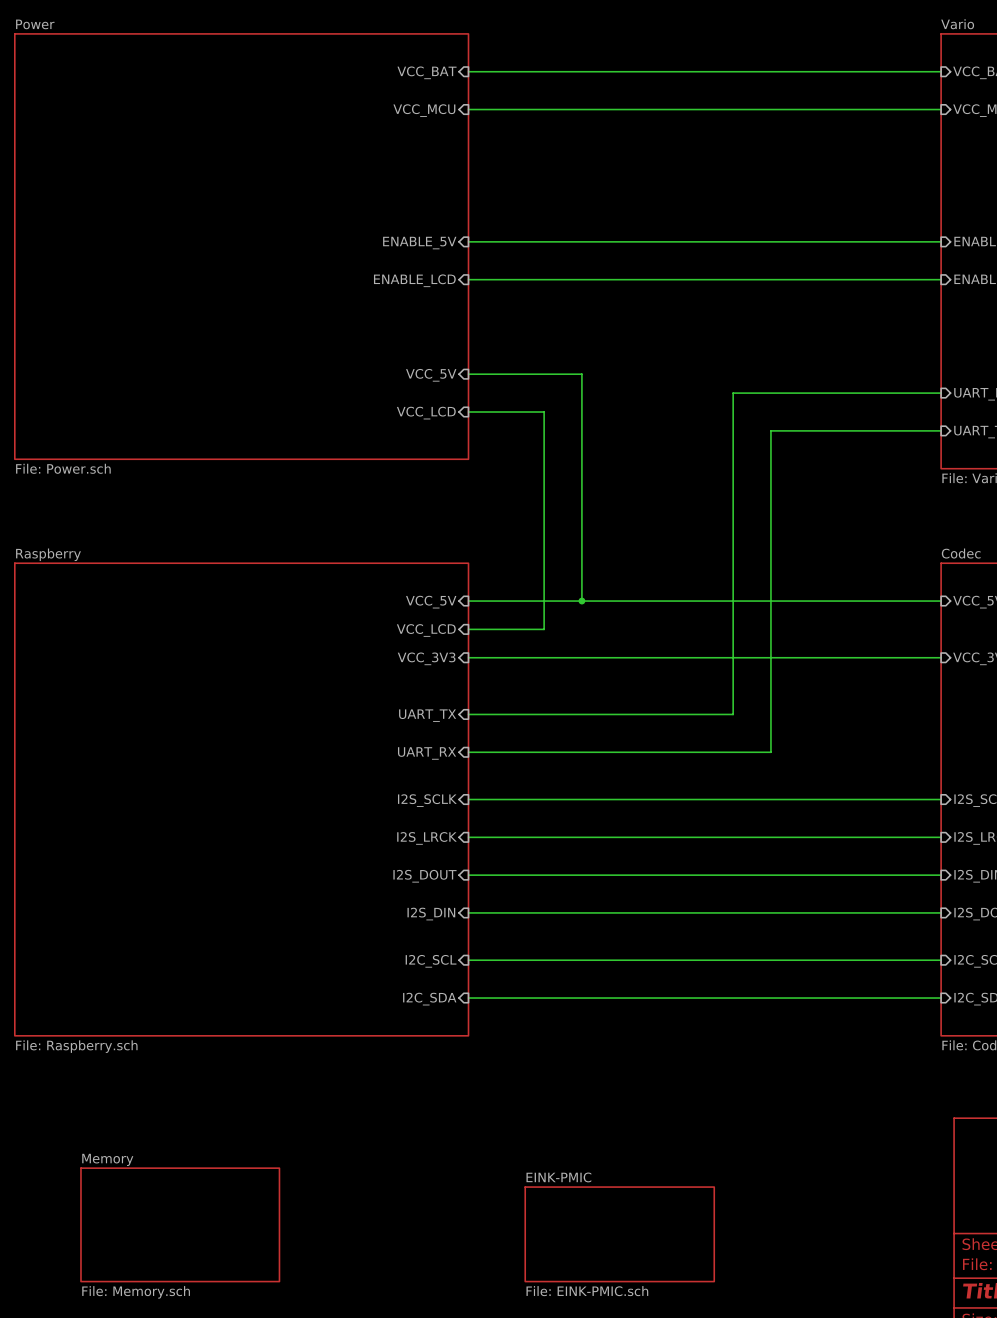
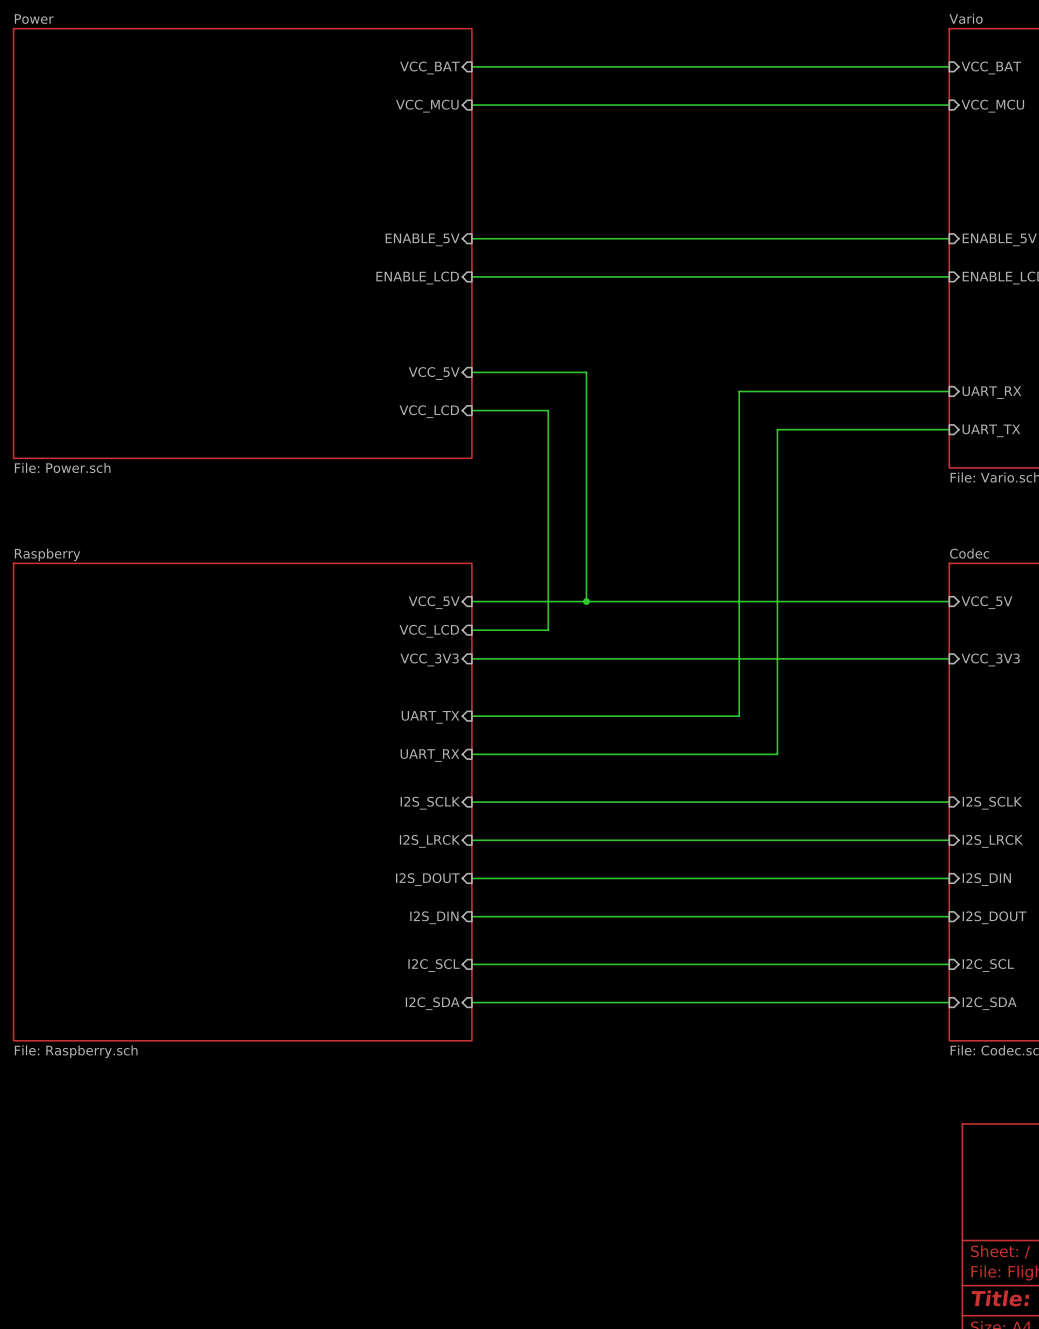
sheet Memory: File: Memory.sch (180, 1224) -> none
sheet EINK-PMIC: File: EINK-PMIC.sch (619, 1234) -> none

